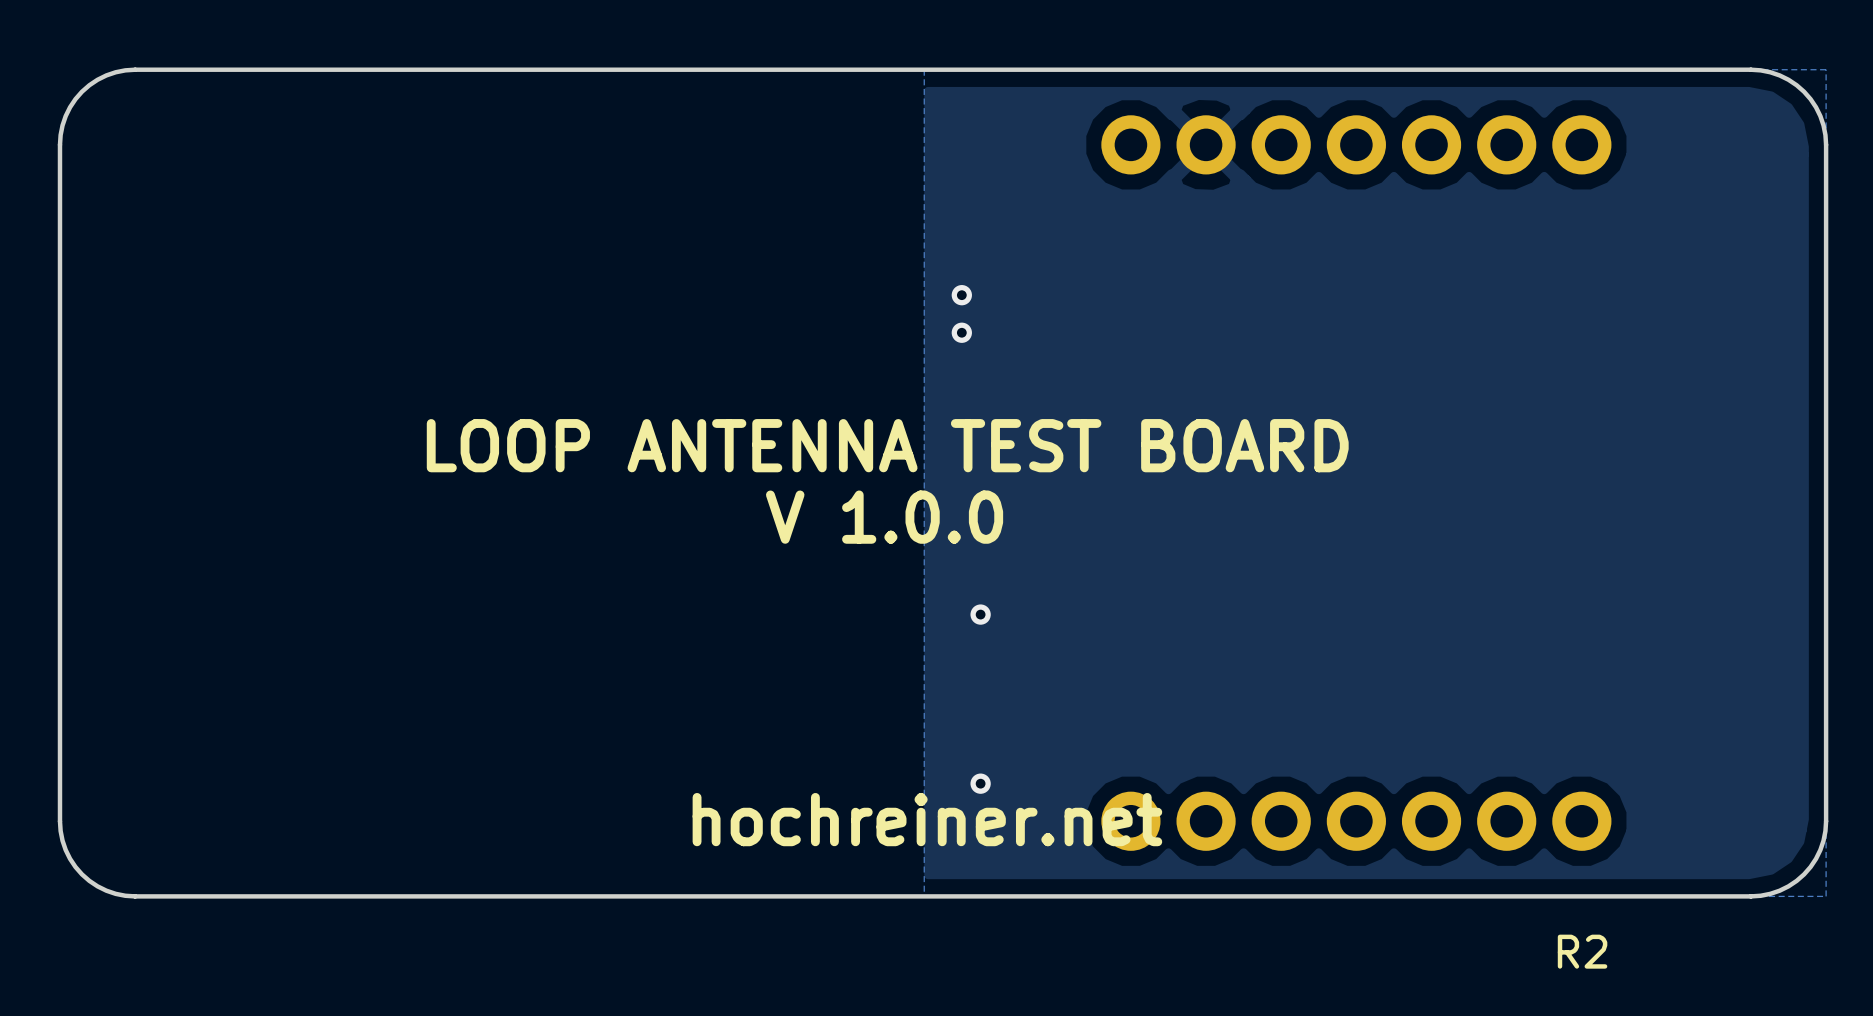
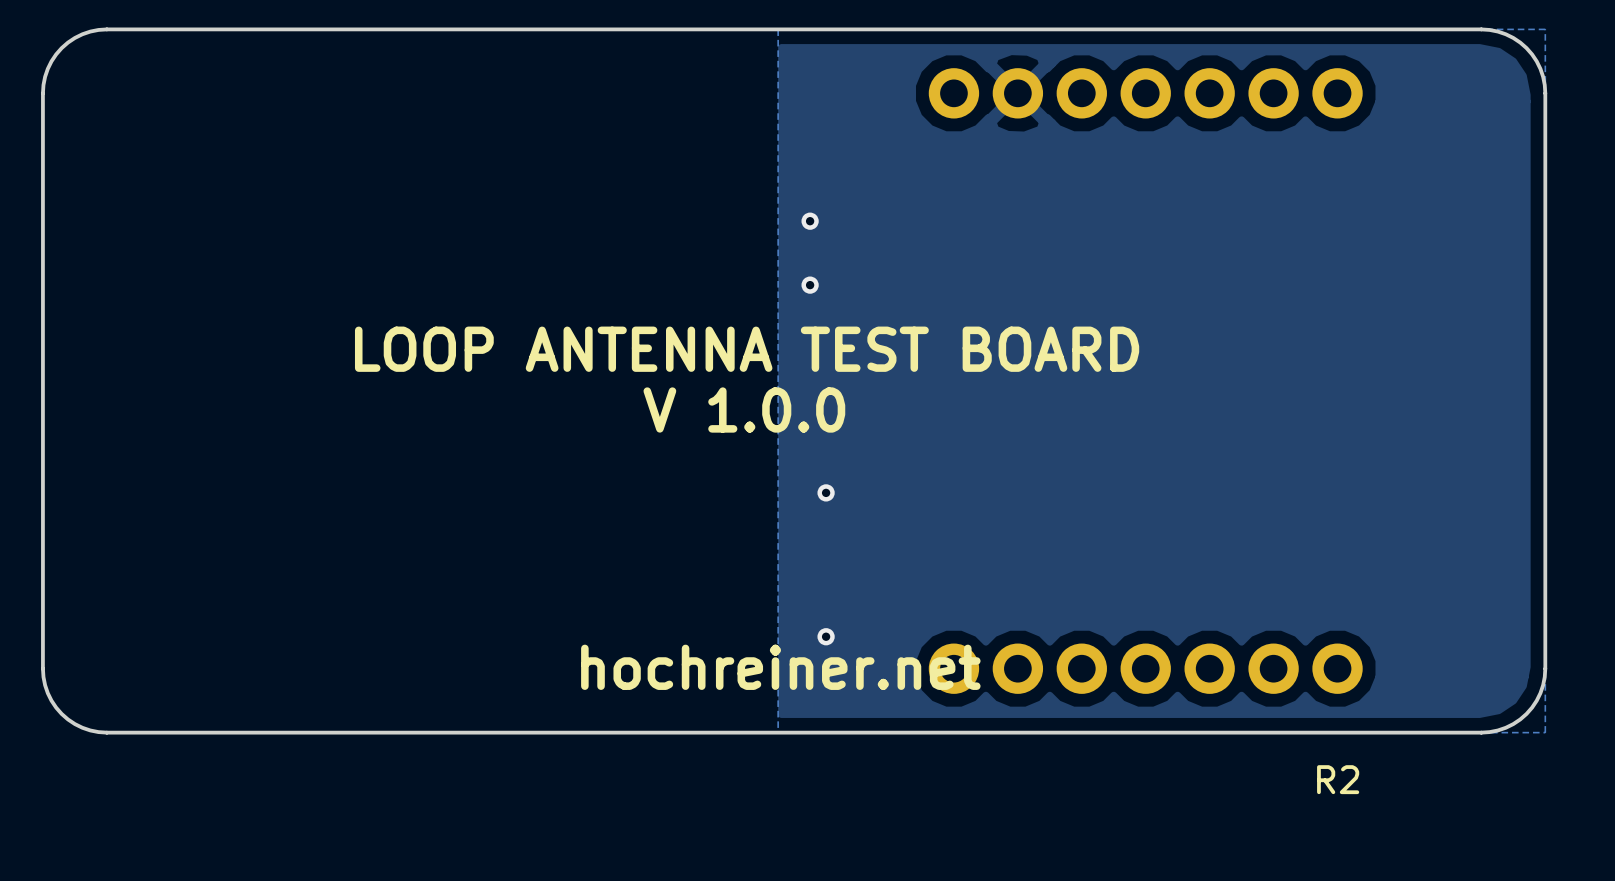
via position: (961, 332) -> (810, 285)

